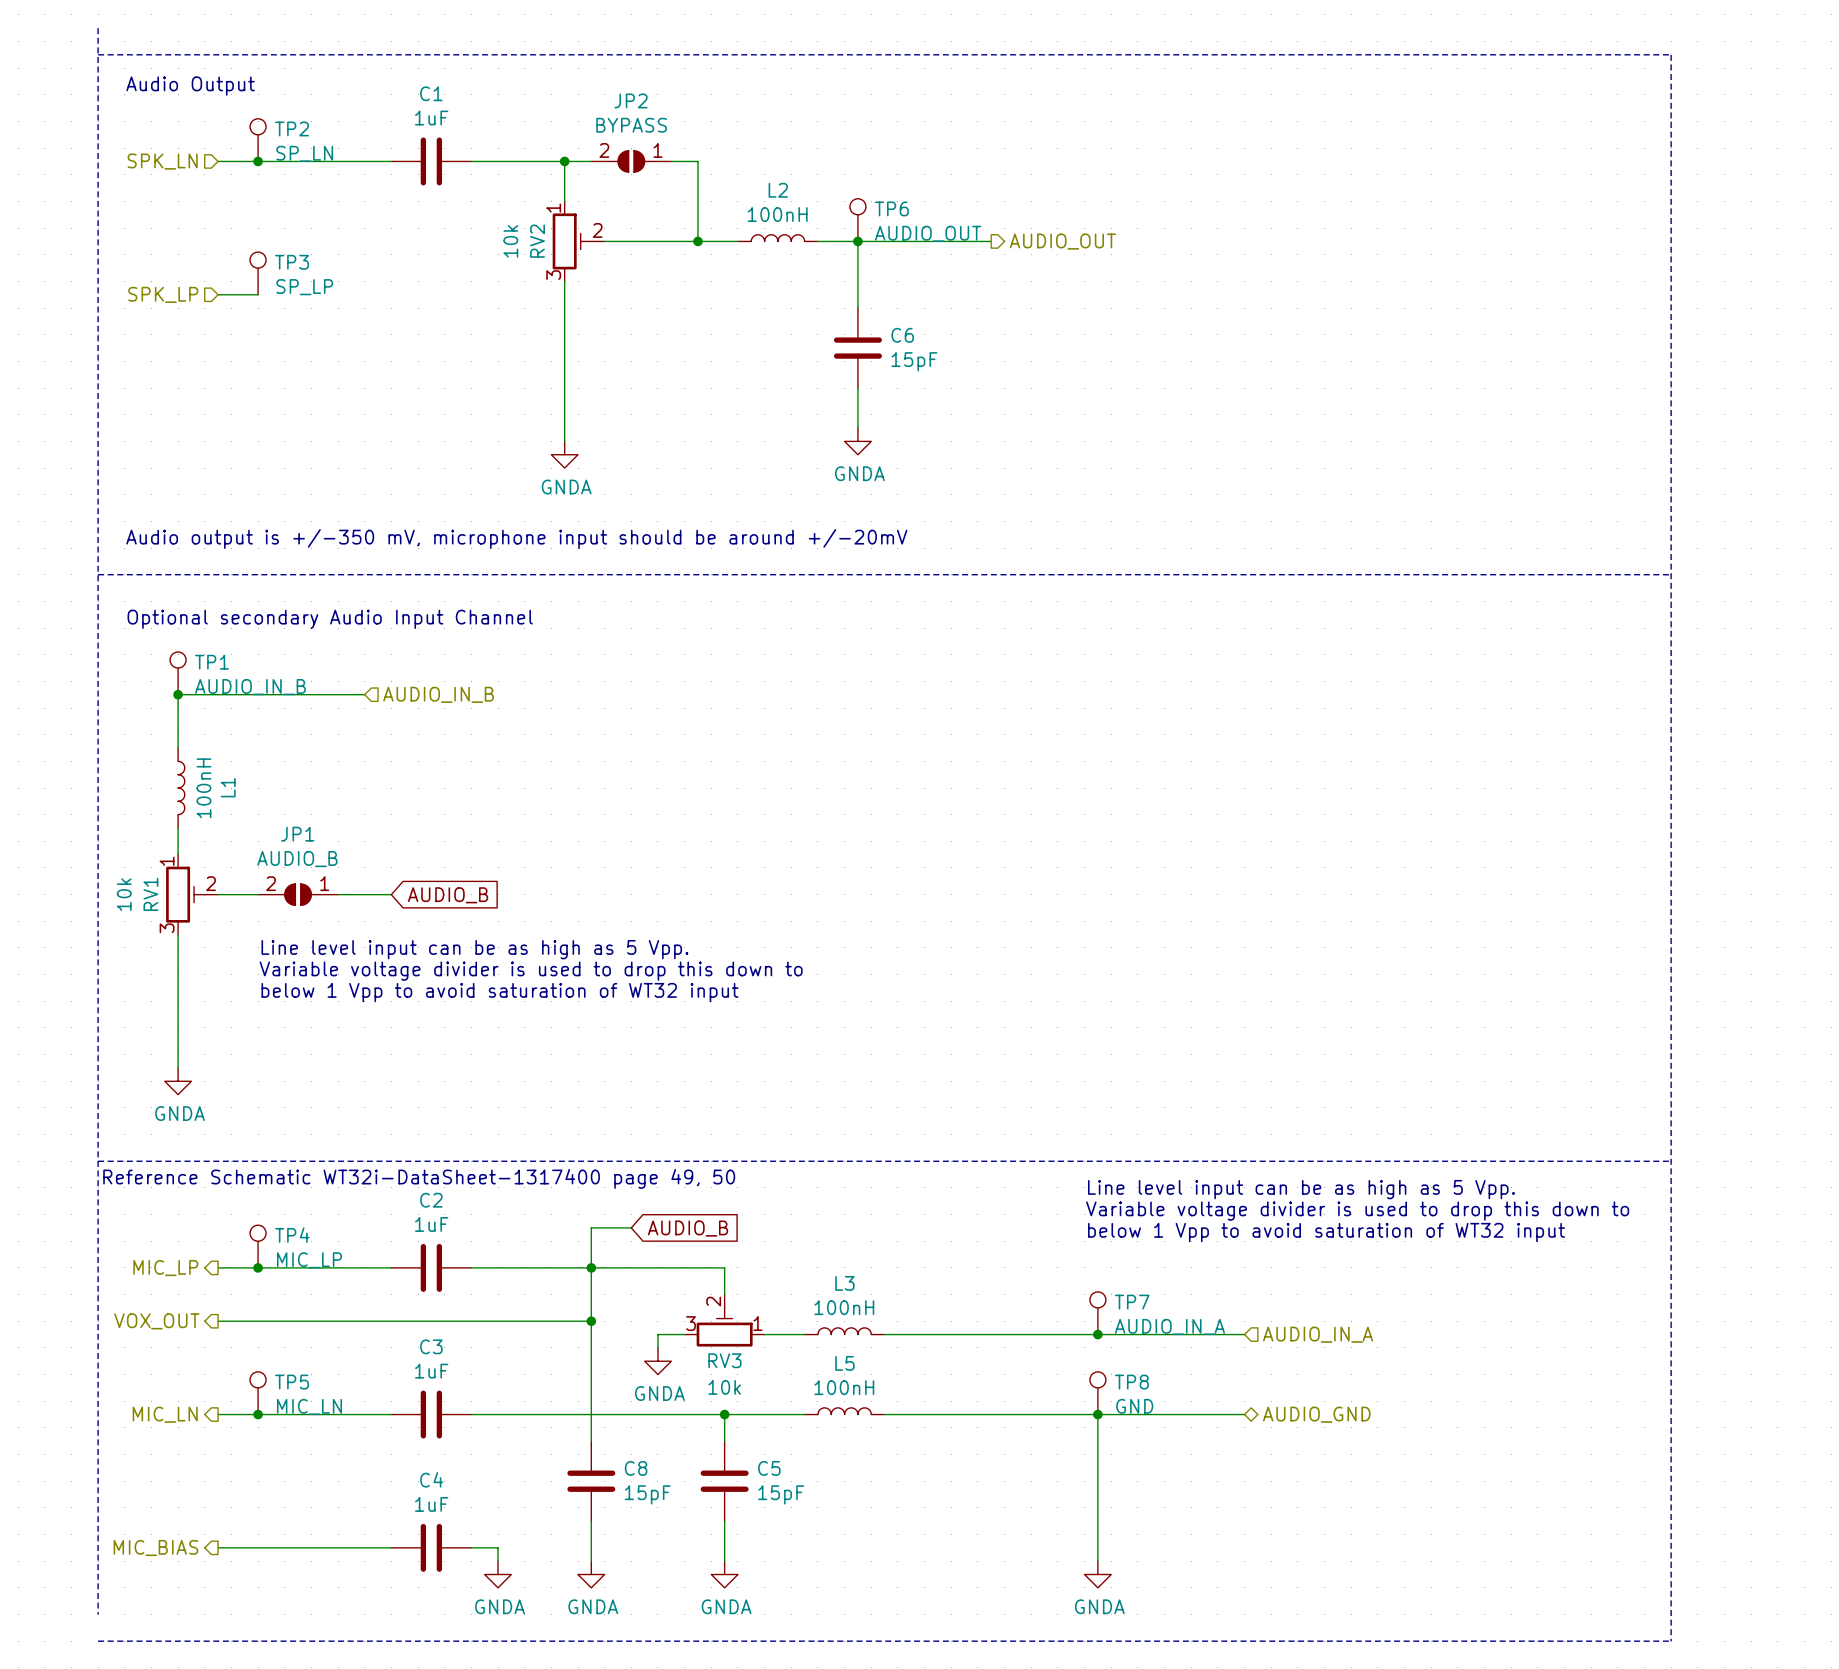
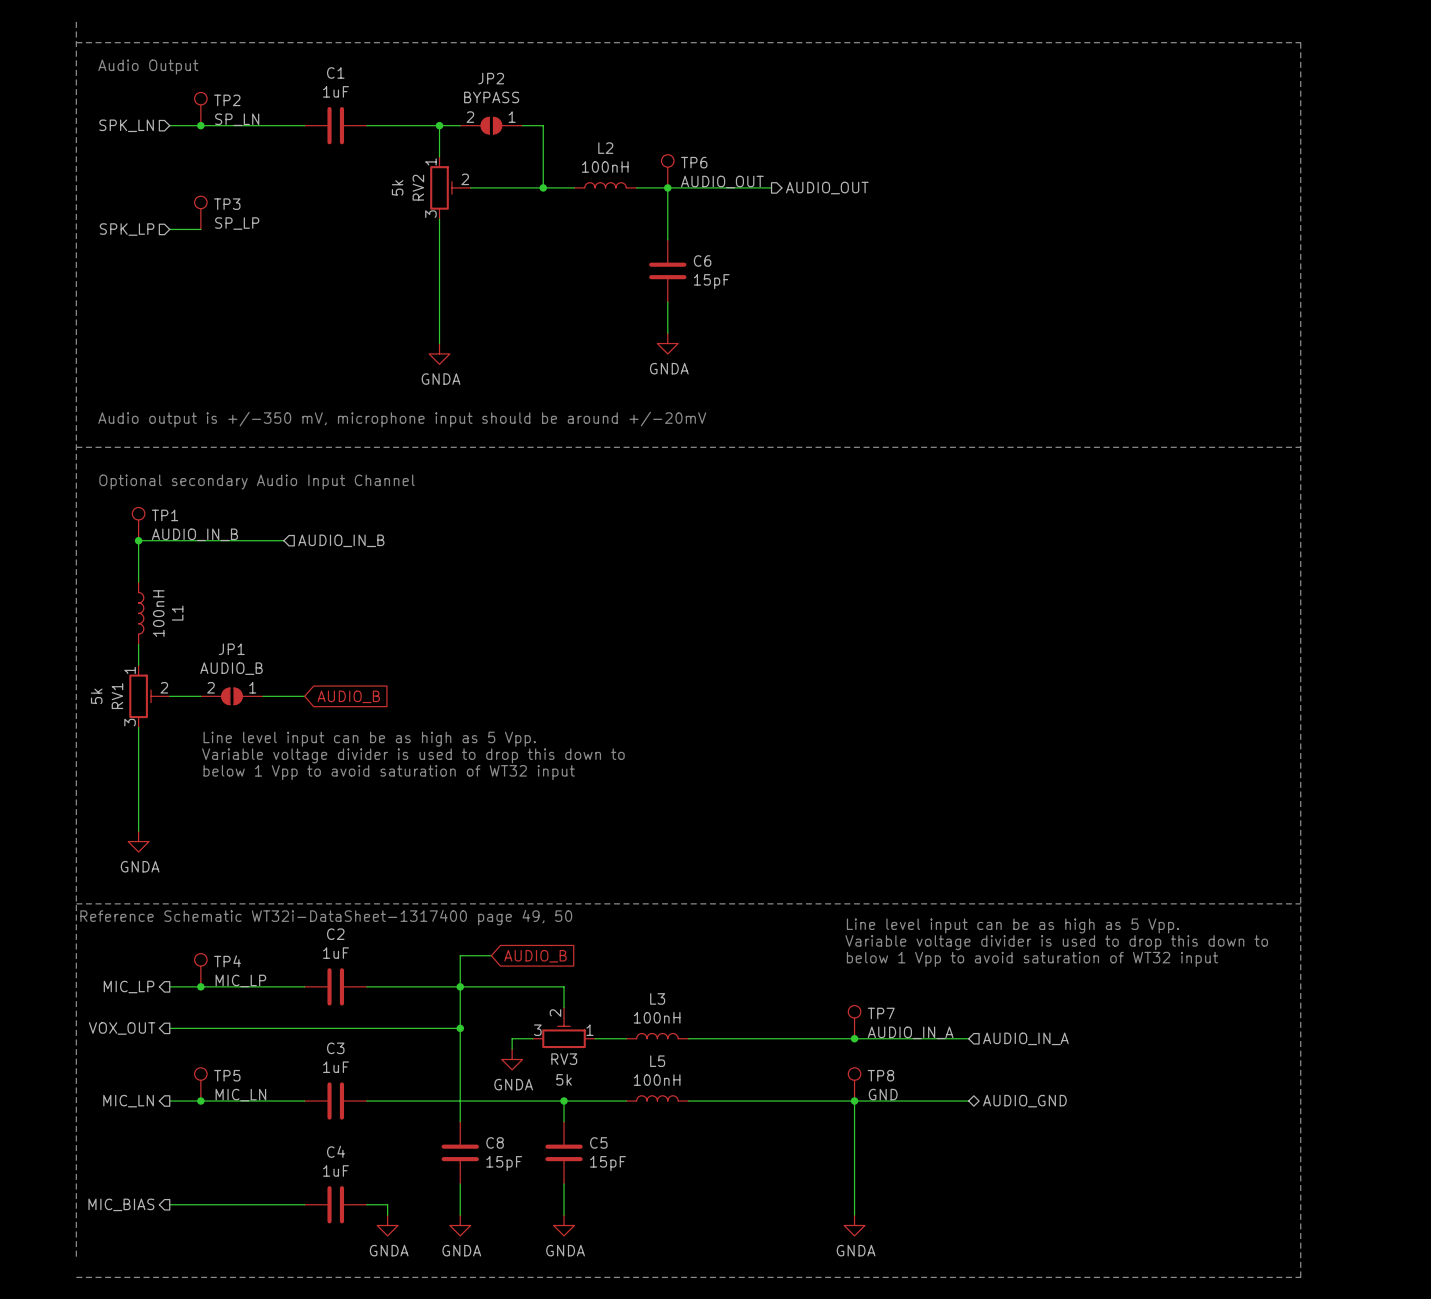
RV2 value: 10k (510, 241) -> 5k (397, 187)
RV1 value: 10k (124, 894) -> 5k (96, 696)
RV3 value: 10k (724, 1387) -> 5k (564, 1079)

